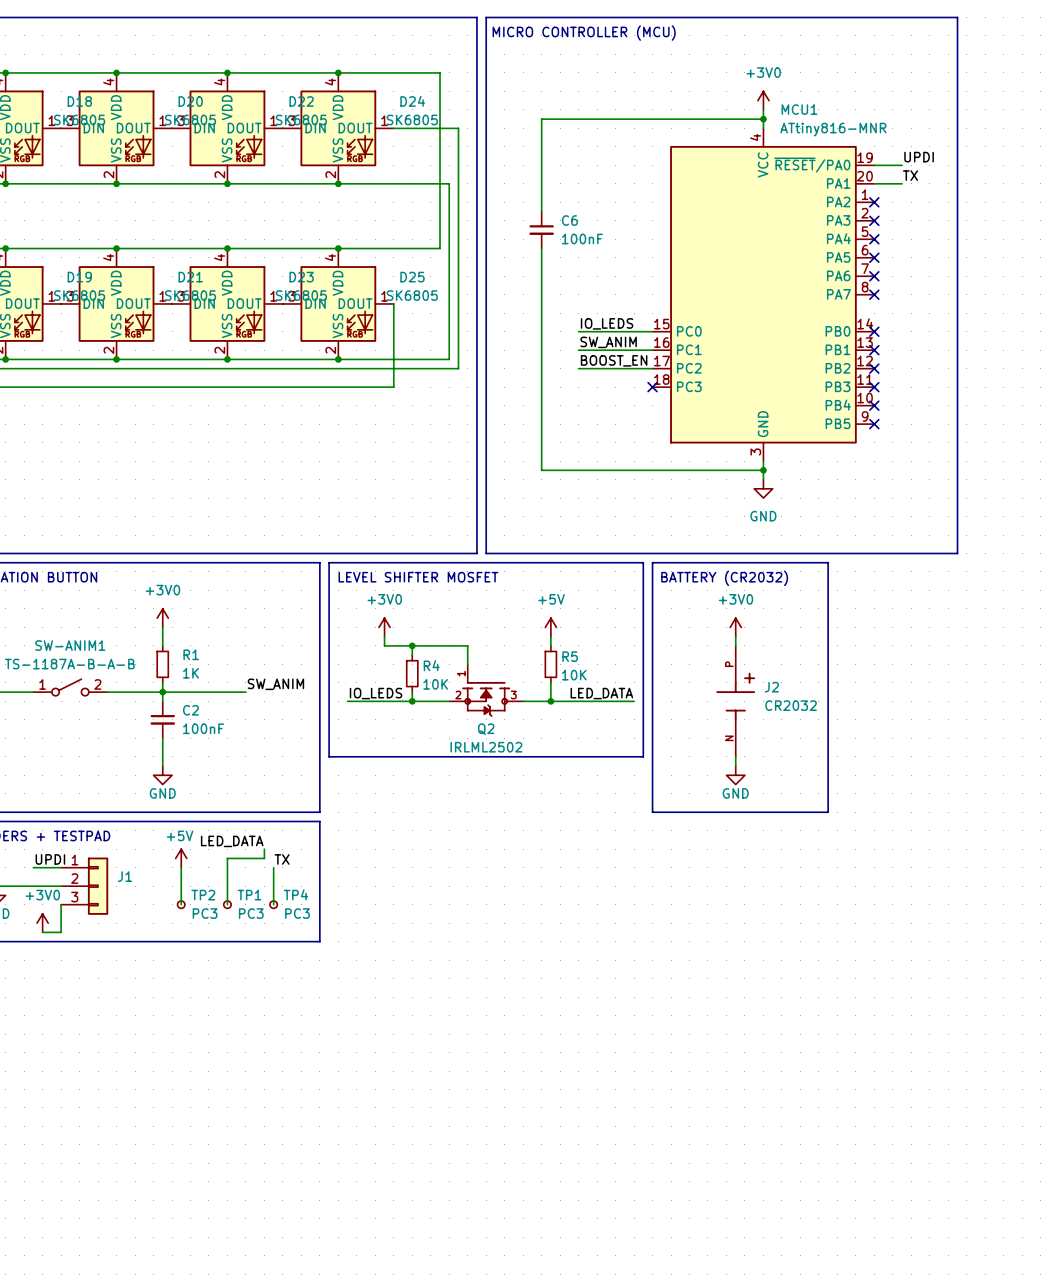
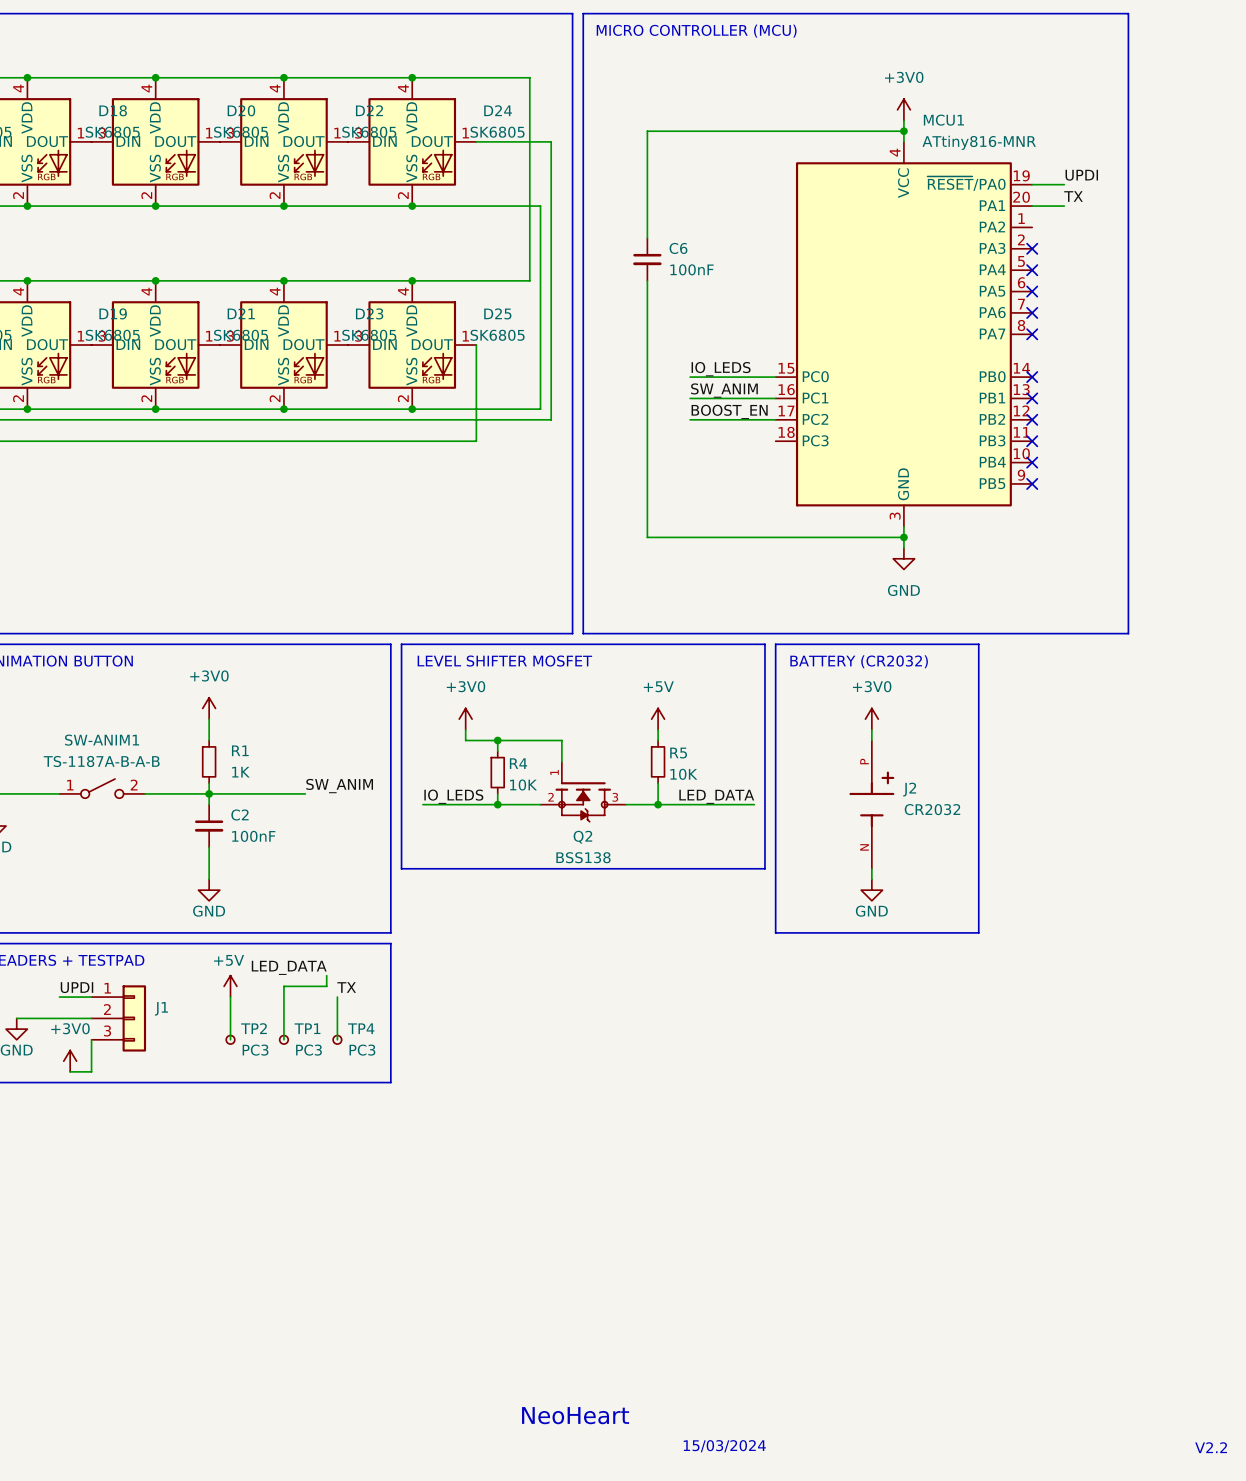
no-connect mark: (874, 202) -> none
no-connect mark: (652, 387) -> none
Q2 value: IRLML2502 (486, 747) -> BSS138 (583, 857)
text: none -> NeoHeart (575, 1415)
text: none -> 15/03/2024 (724, 1446)
text: none -> V2.2 (1211, 1447)

